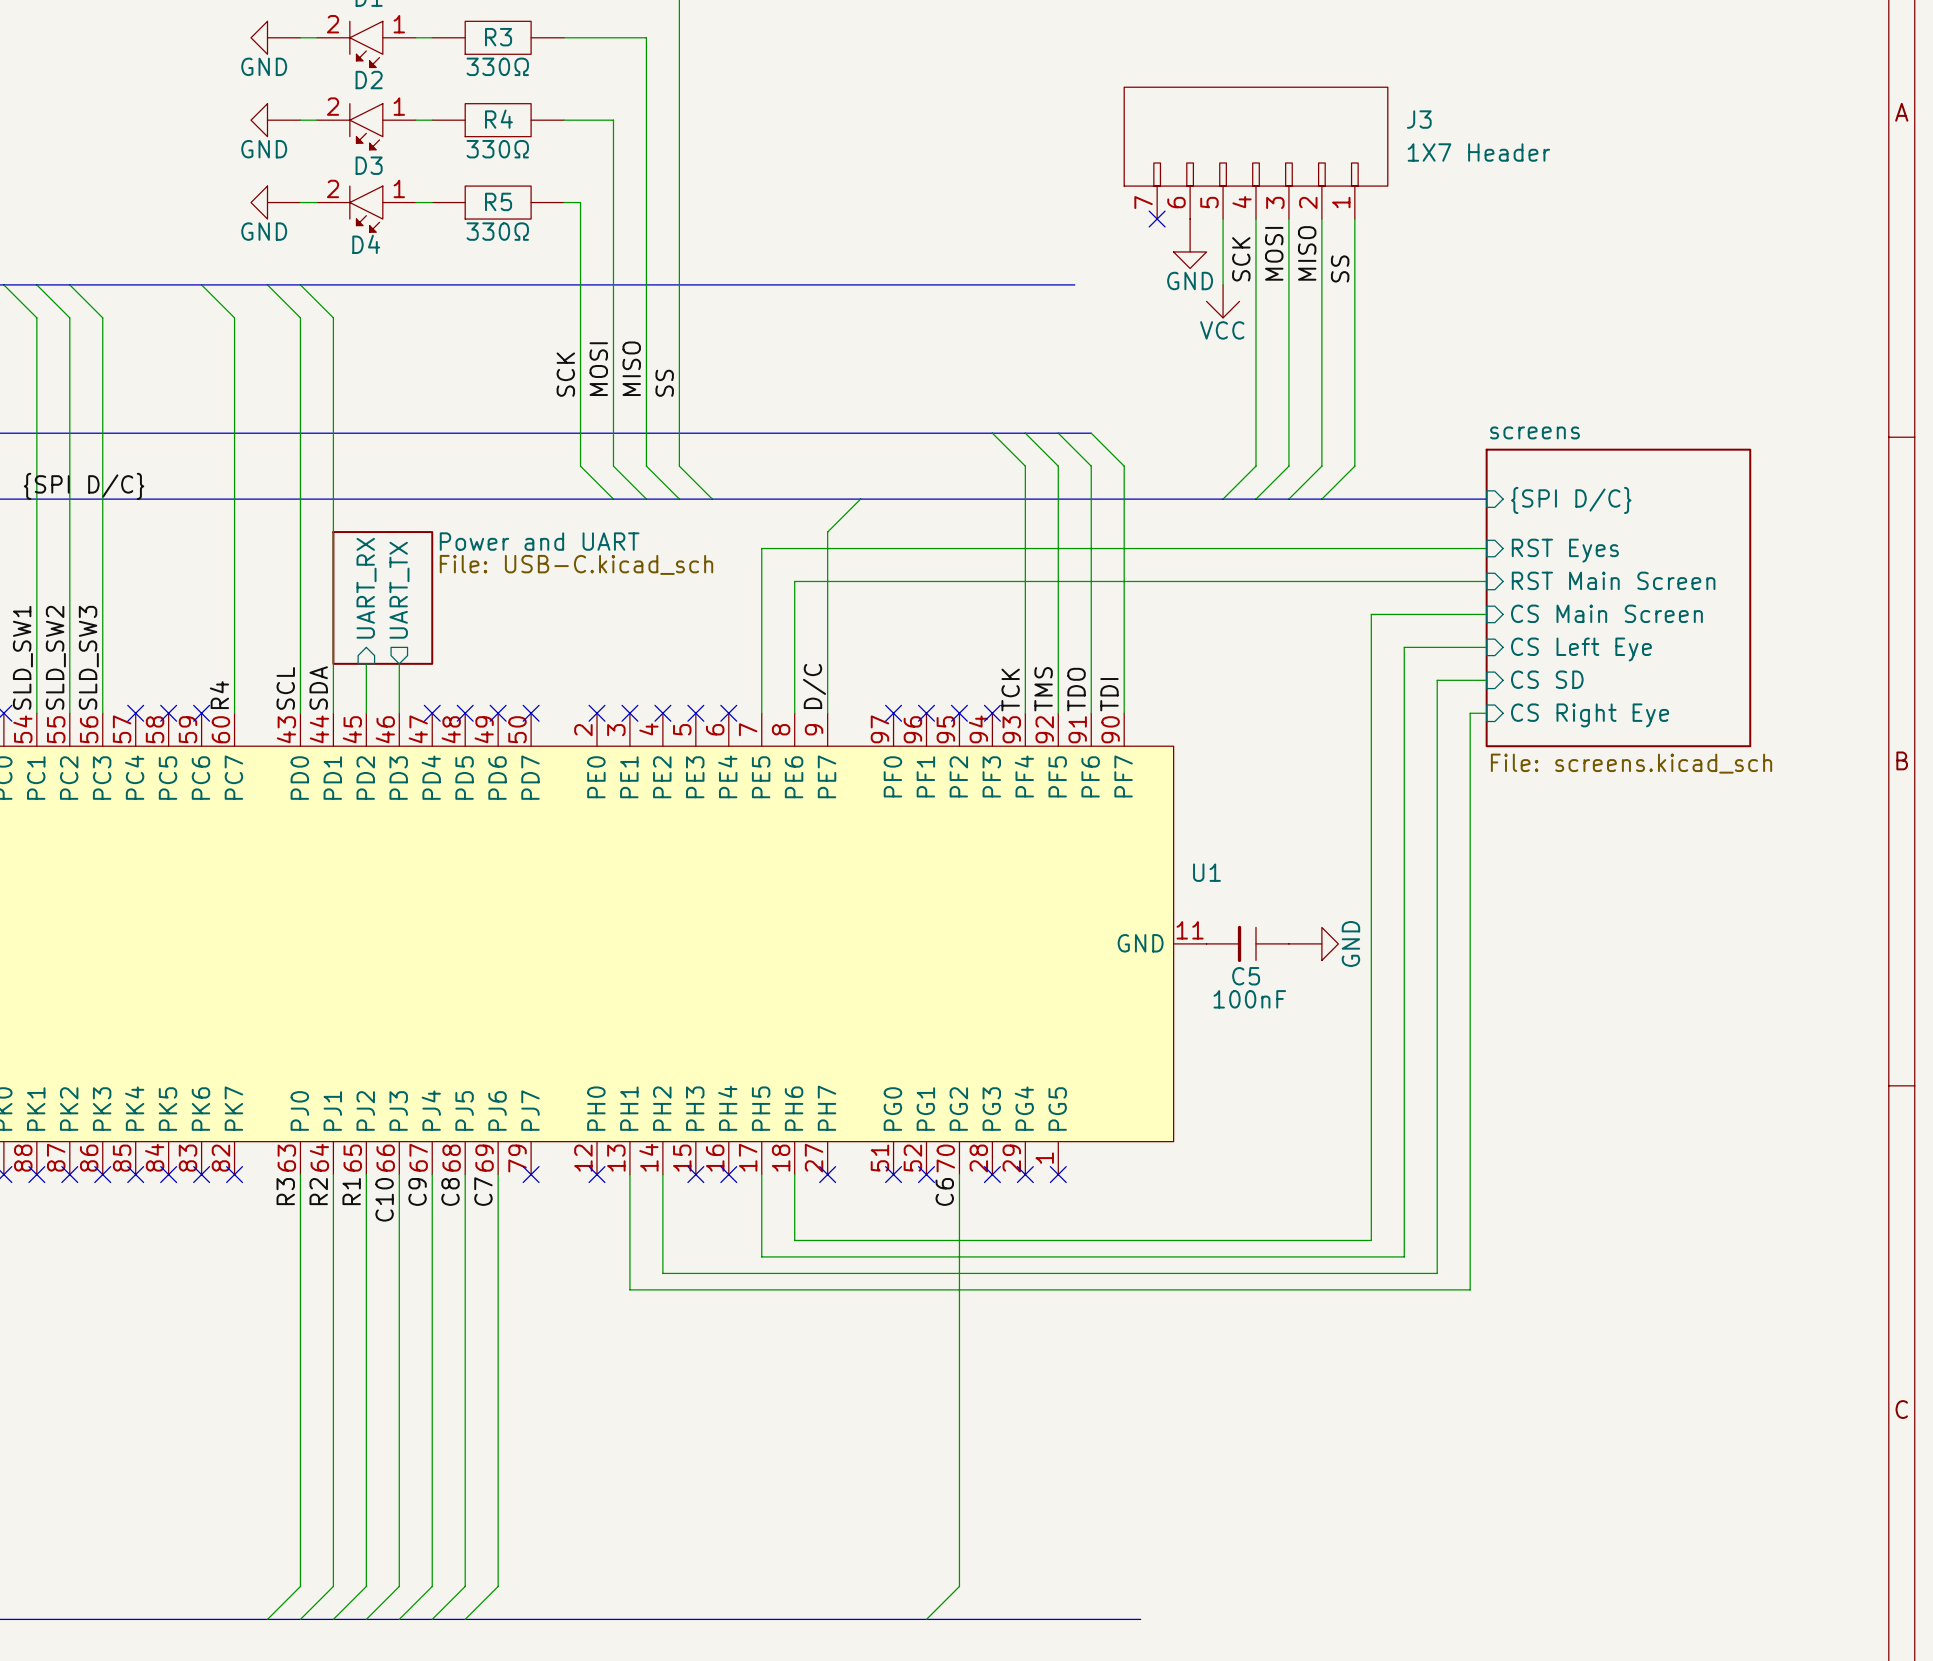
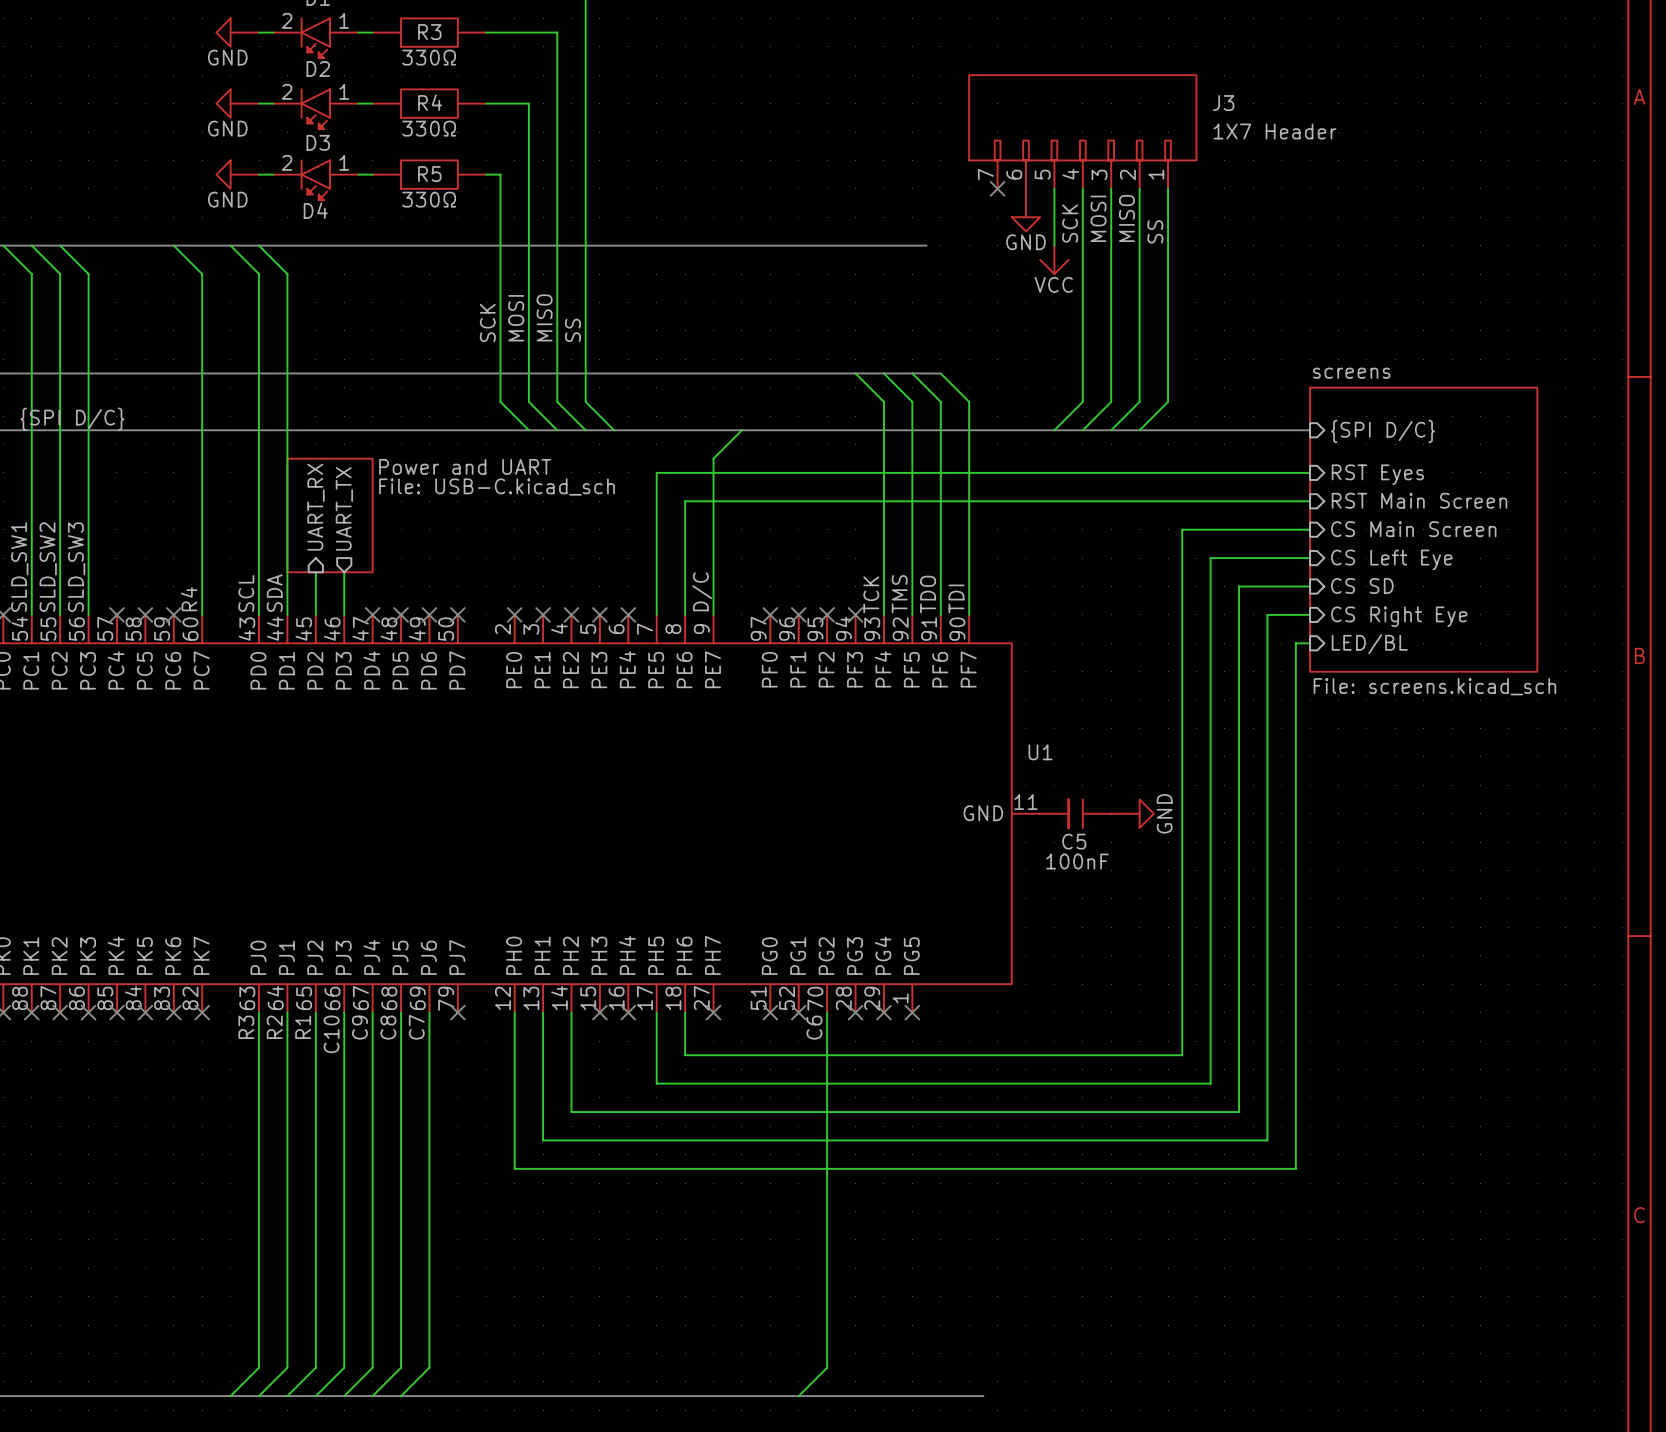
bus: none -> (1281, 430) (1310, 430)
sheet pin position: {SPI D/C} (1571, 500) -> {SPI D/C} (1382, 431)
wire: none -> (1281, 472) (1310, 472)
sheet pin position: RST Eyes (1565, 550) -> RST Eyes (1377, 474)
sheet pin position: RST Main Screen (1613, 580) -> RST Main Screen (1419, 500)
wire: none -> (1281, 501) (1310, 501)
sheet screens: File: screens.kicad_sch (1618, 597) -> none
sheet pin position: CS Main Screen (1606, 613) -> CS Main Screen (1413, 529)
wire: none -> (1281, 529) (1310, 529)
sheet screens: none -> File: screens.kicad_sch (1423, 529)
wire: none -> (1281, 558) (1310, 558)
sheet pin position: CS Left Eye (1581, 649) -> CS Left Eye (1391, 559)
sheet pin position: CS SD (1547, 679) -> CS SD (1362, 585)
wire: none -> (1281, 586) (1310, 586)
wire: none -> (1281, 614) (1310, 614)
sheet pin position: CS Right Eye (1590, 715) -> CS Right Eye (1399, 616)
wire: none -> (1310, 643) (1295, 643) (1295, 1168) (514, 1168) (514, 1012)
sheet pin: none -> LED/BL (1369, 644)
no-connect mark: (597, 1174) -> none
wire: (794, 1224) (794, 1240) (1371, 1240) (1371, 1224) -> (685, 1055) (1182, 1055)
wire: (662, 1273) (1437, 1273) -> none
wire: (629, 1289) (662, 1289) -> (571, 1097) (571, 1112)
wire: none -> (543, 1112) (543, 1140) (1267, 1140) (1267, 1112)
wire: (1437, 1289) (1470, 1289) -> (1239, 1112) (1239, 1097)

